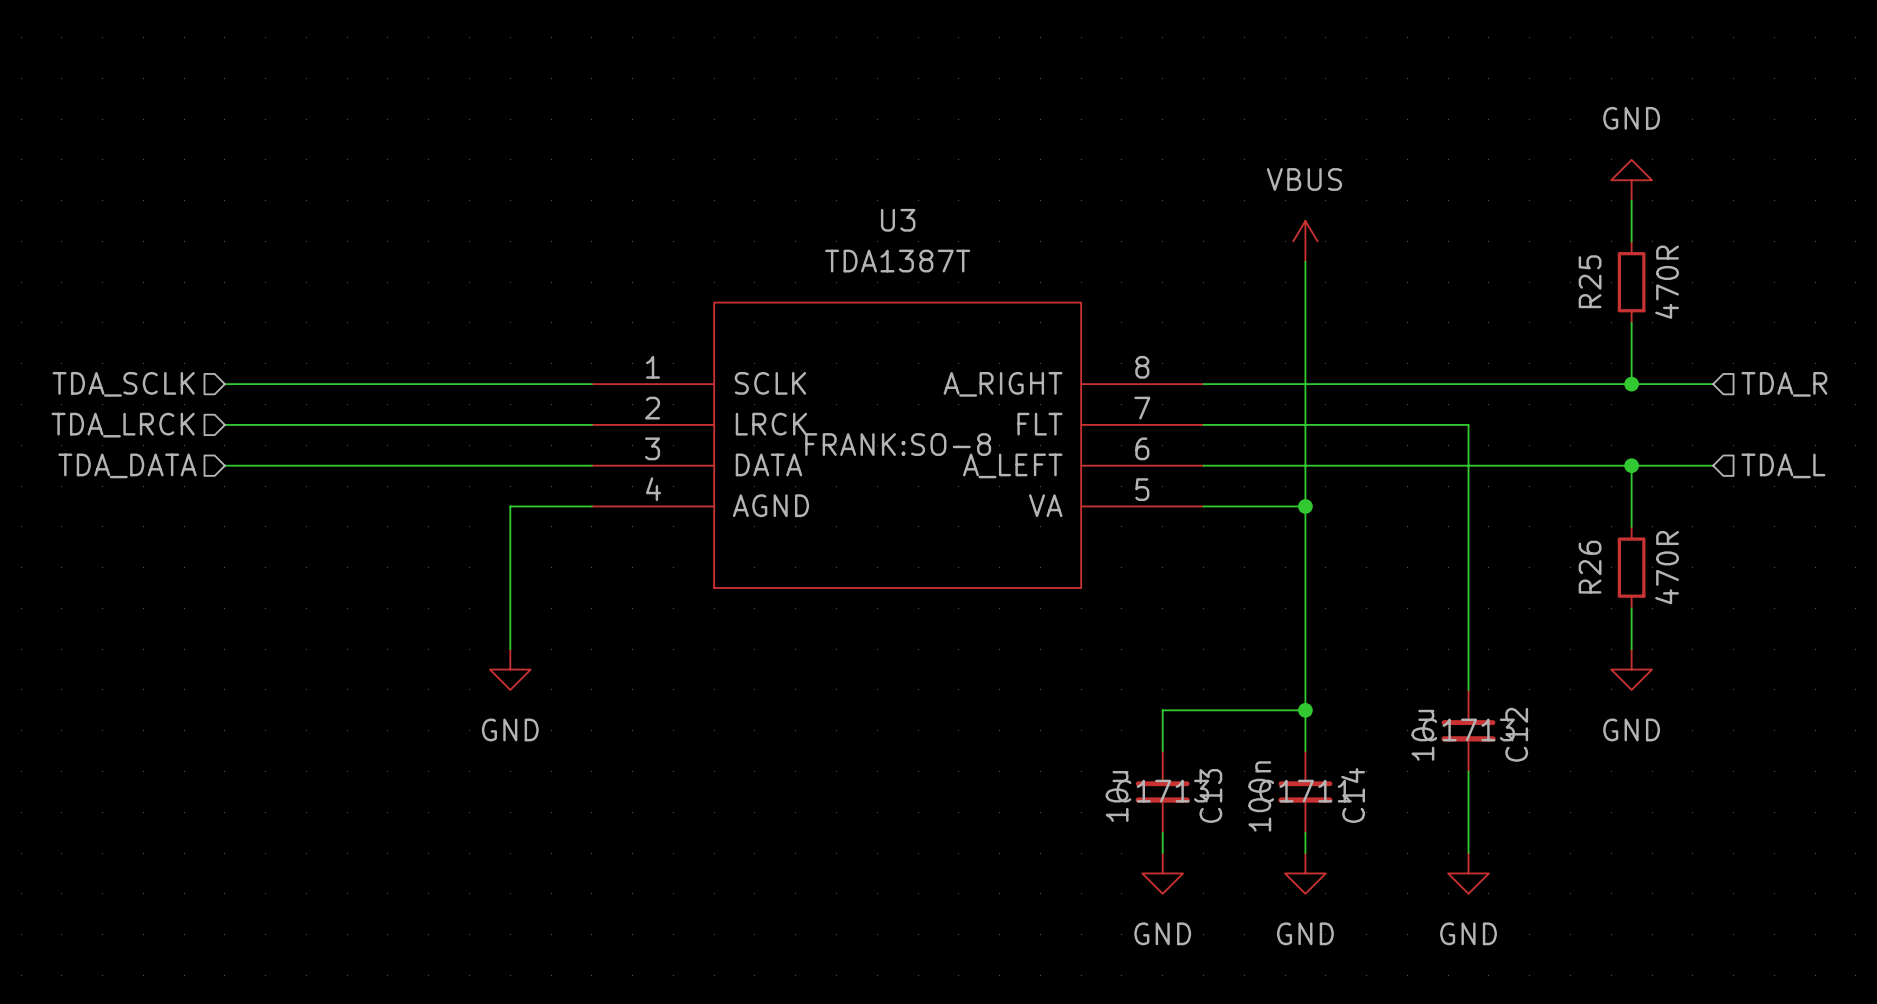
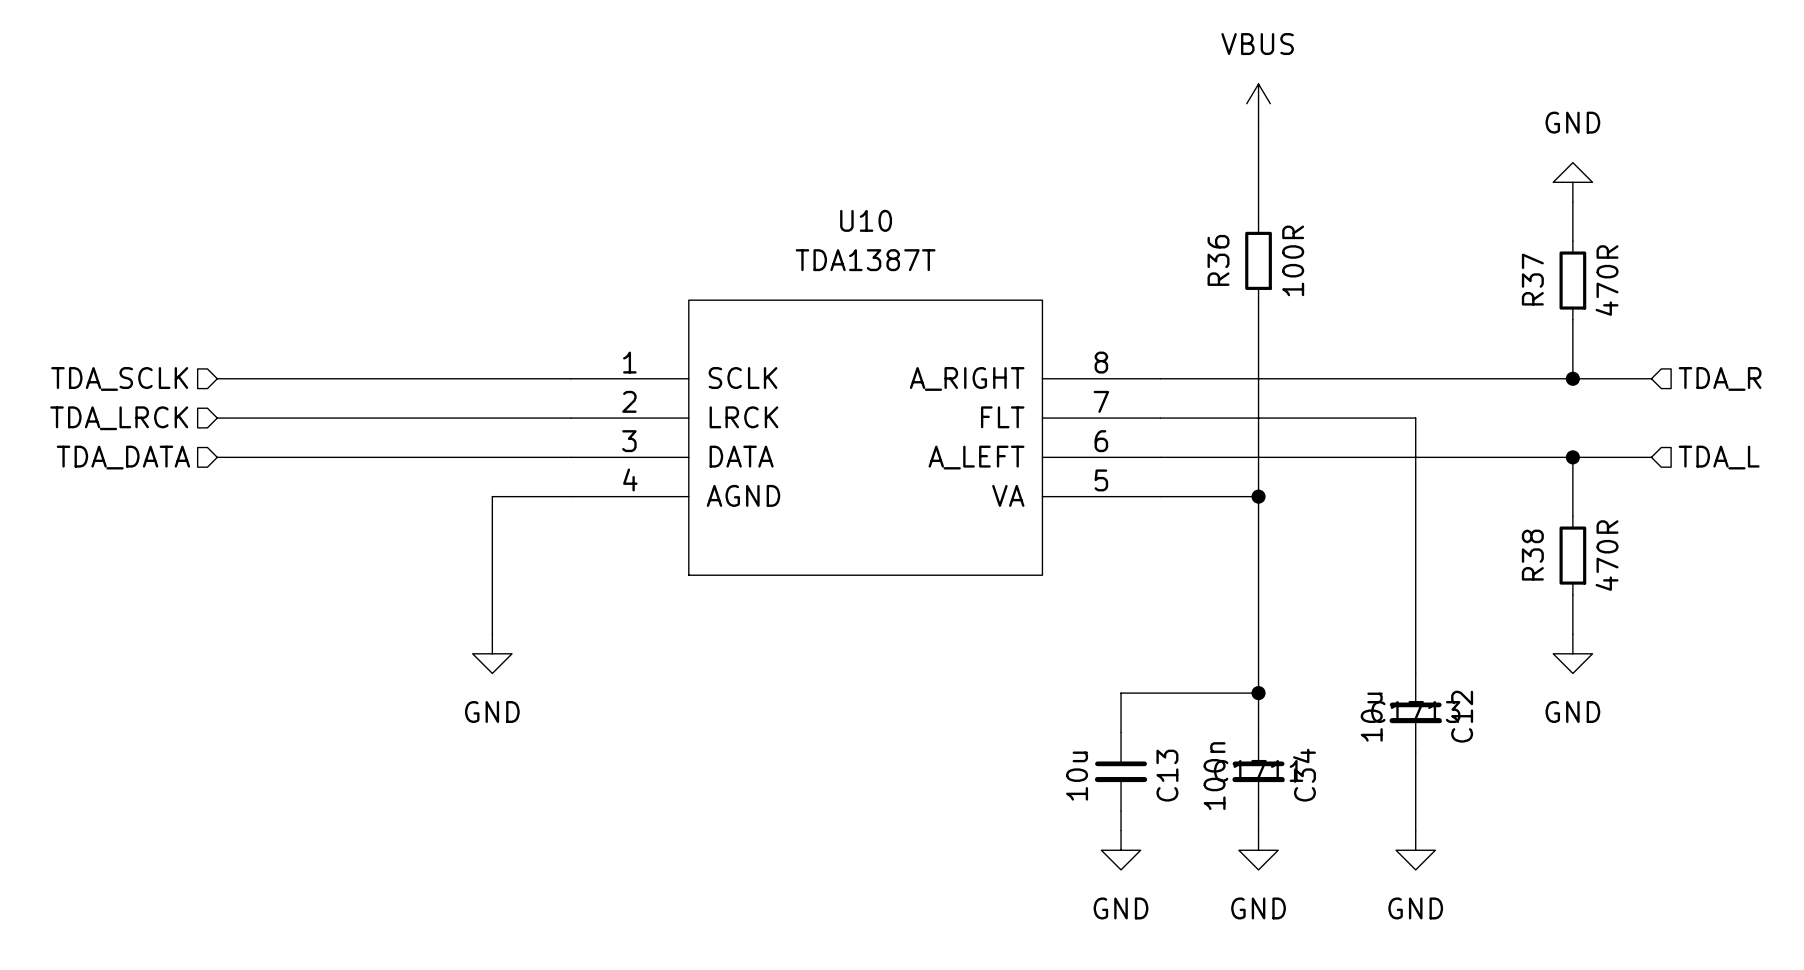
wire: none -> (1258, 123) (1258, 221)
U3 name: U3 (898, 220) -> U10 (866, 220)
power symbol position: VBUS (1305, 241) -> VBUS (1258, 103)
wire: (1305, 261) (1305, 302) -> none
R36: none -> 100R (1258, 260)
R25 name: R25 (1590, 281) -> R37 (1532, 279)
U3 text: FRANK:SO-8 (898, 444) -> none
R26 name: R26 (1590, 567) -> R38 (1532, 555)
C13 text: C1713 (1162, 791) -> none
C14 name: C14 (1353, 795) -> C34 (1304, 775)

